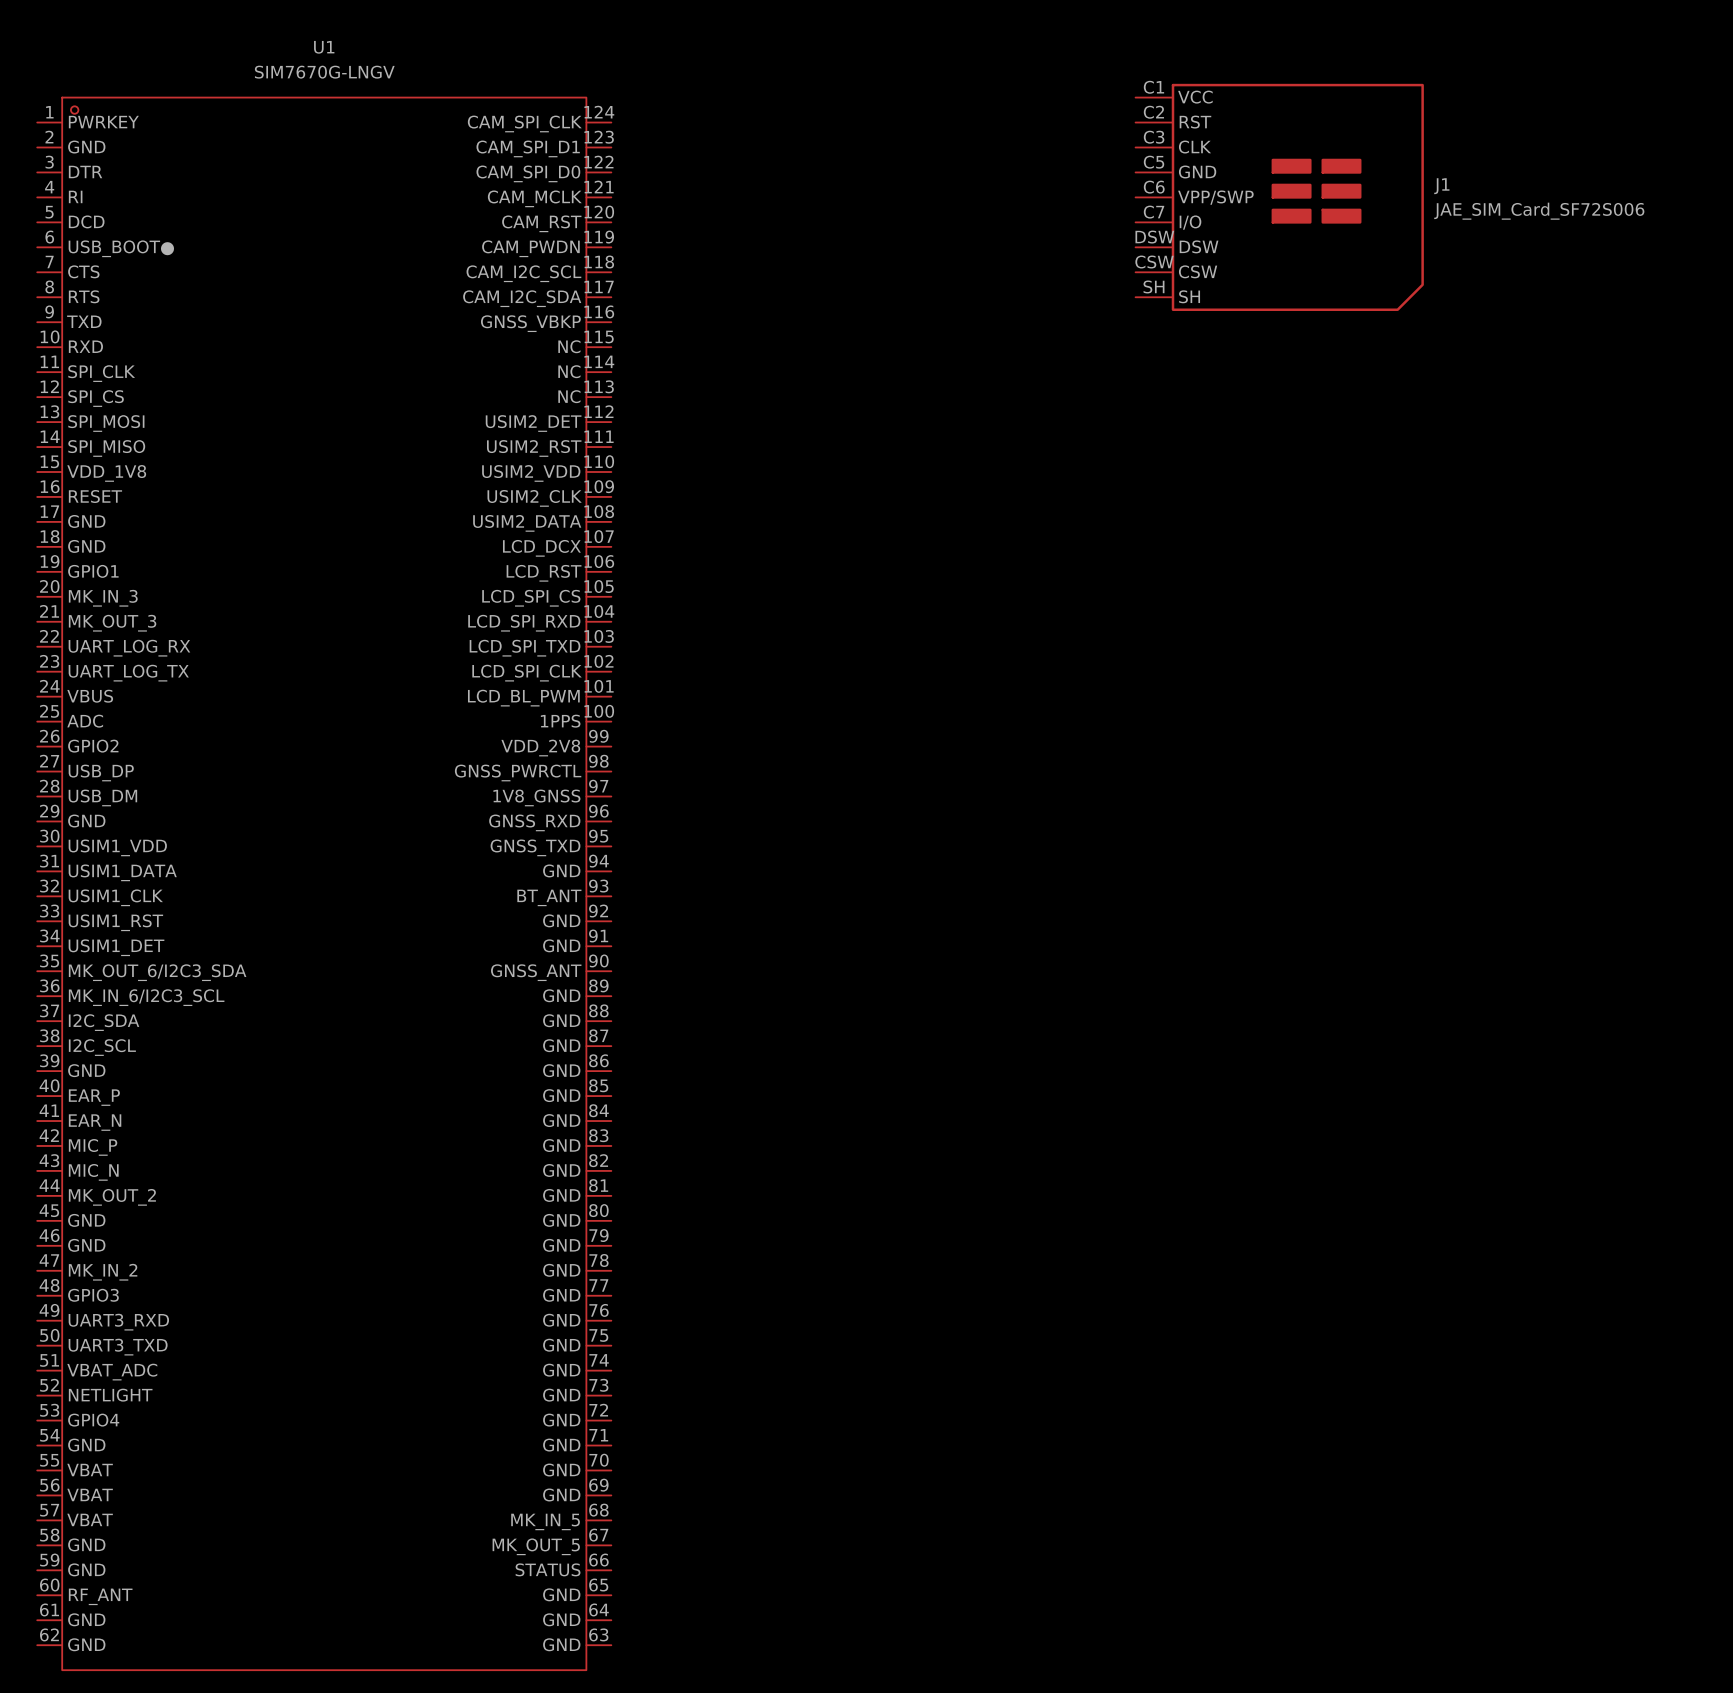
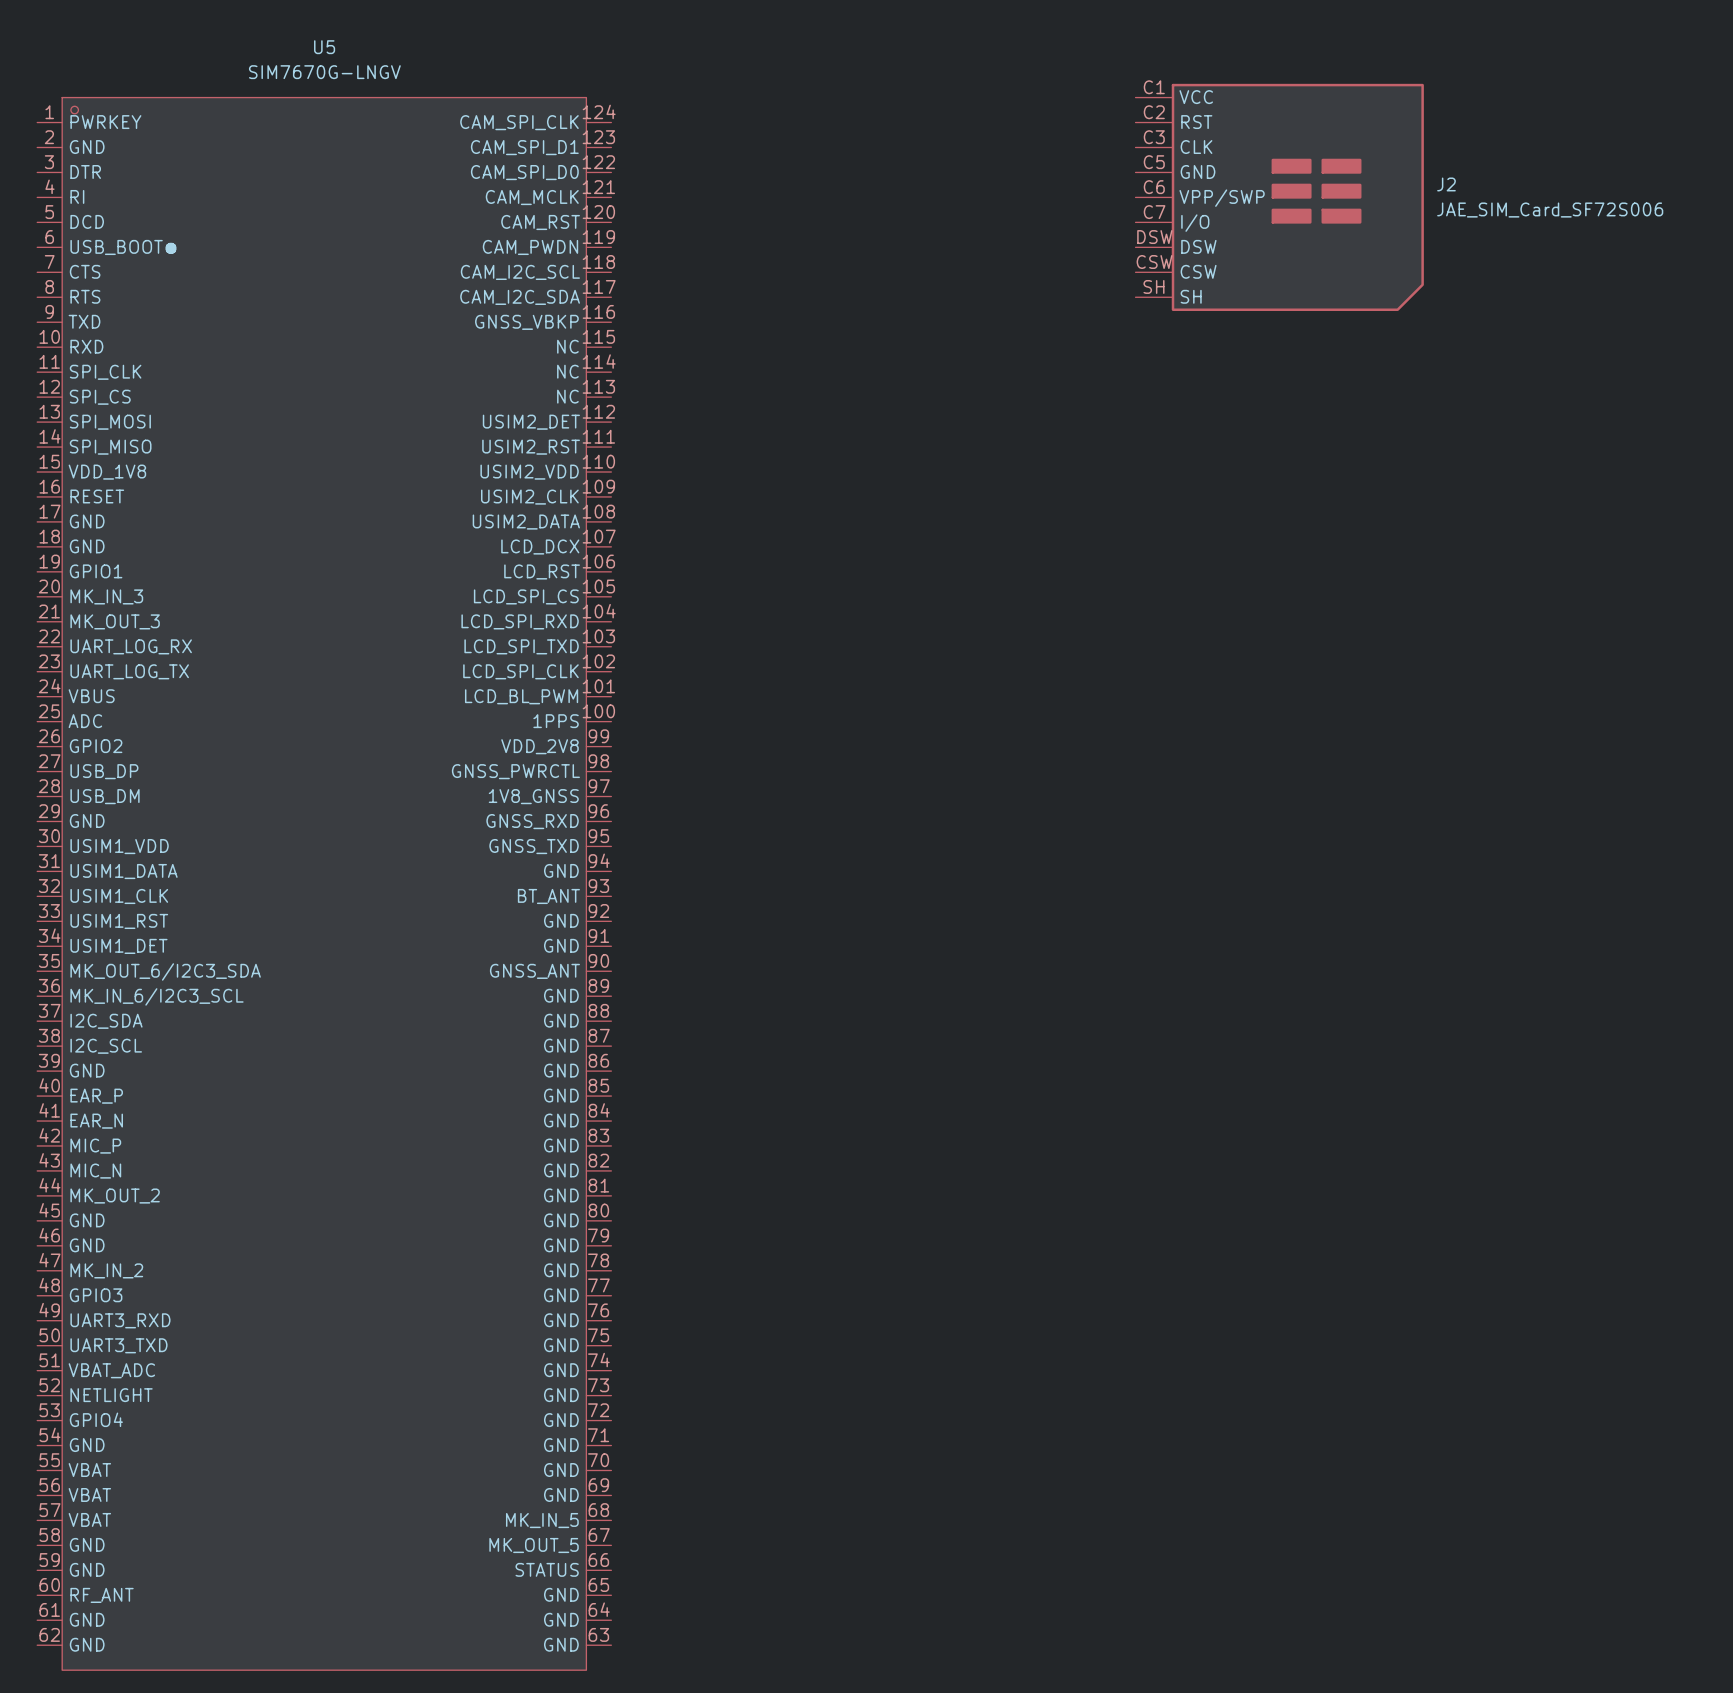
U1 name: U1 (324, 47) -> U5 (324, 47)
J1 name: J1 (1441, 186) -> J2 (1446, 184)

